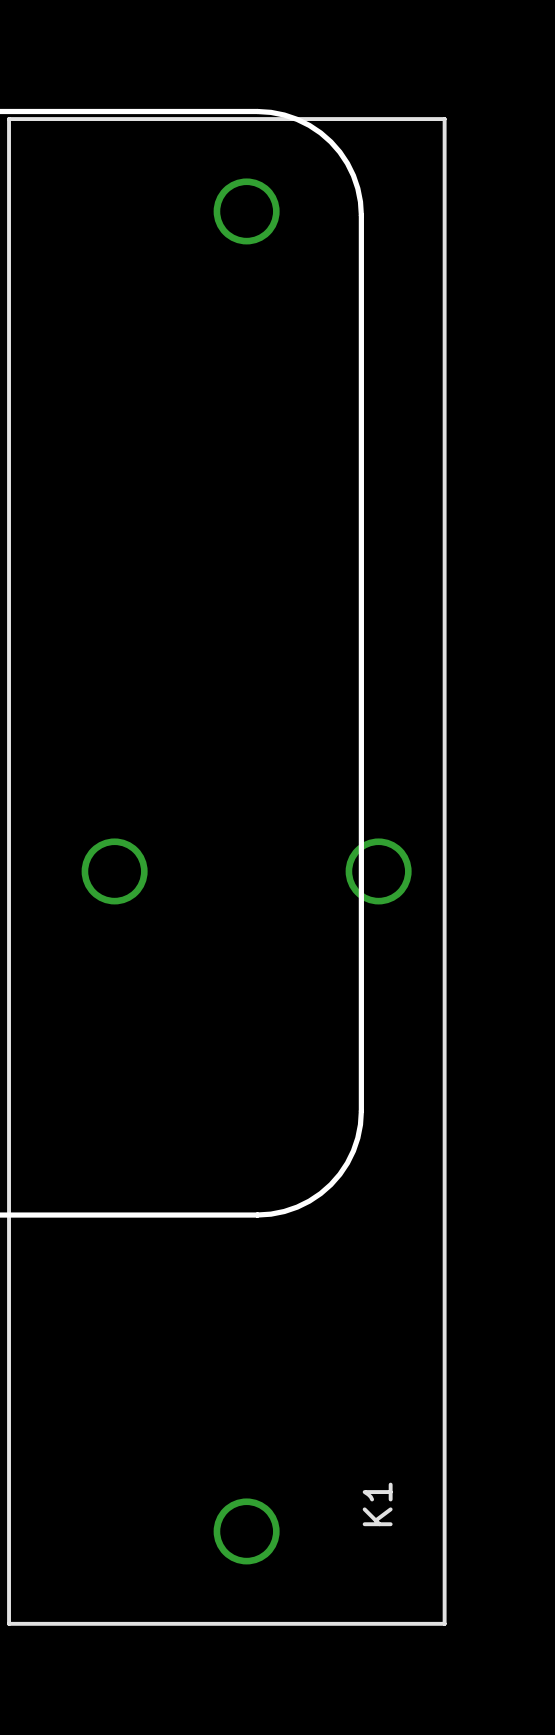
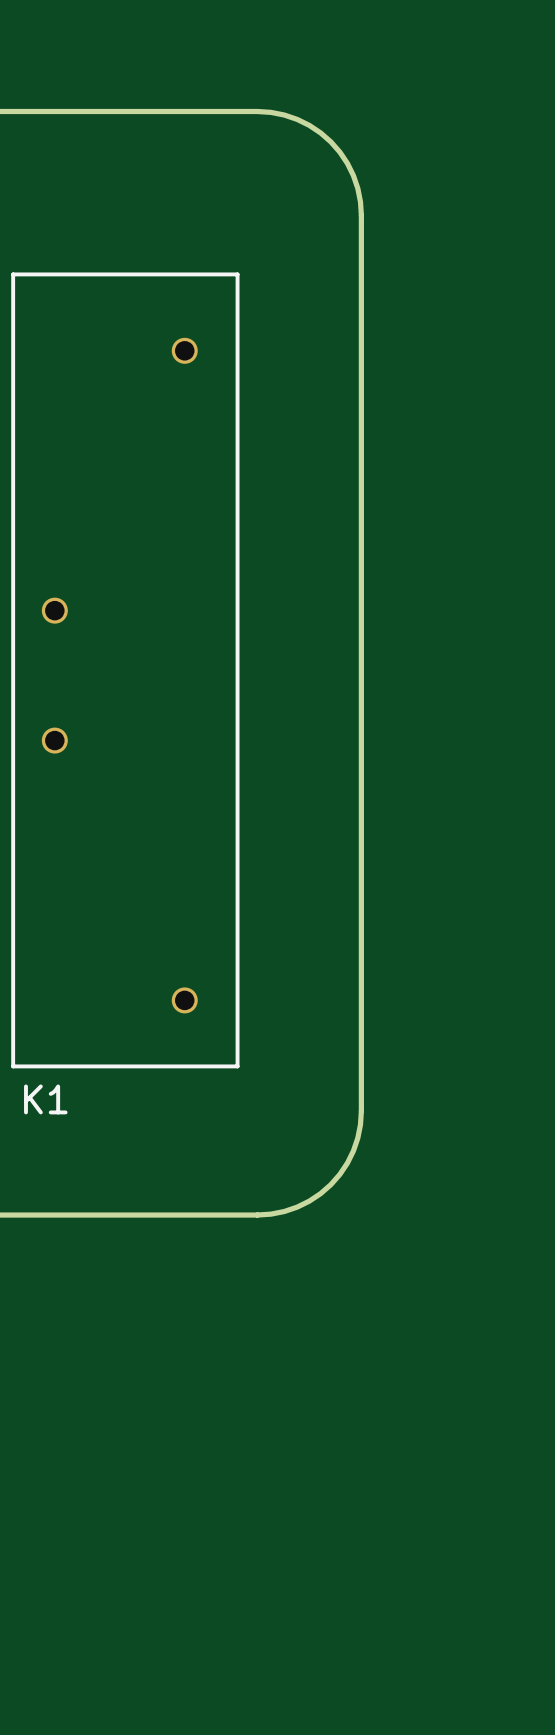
K1 footprint: [7, 117, 447, 1626] -> [11, 272, 240, 1069]
K1 name position: K1 (377, 1504) -> K1 (45, 1099)

